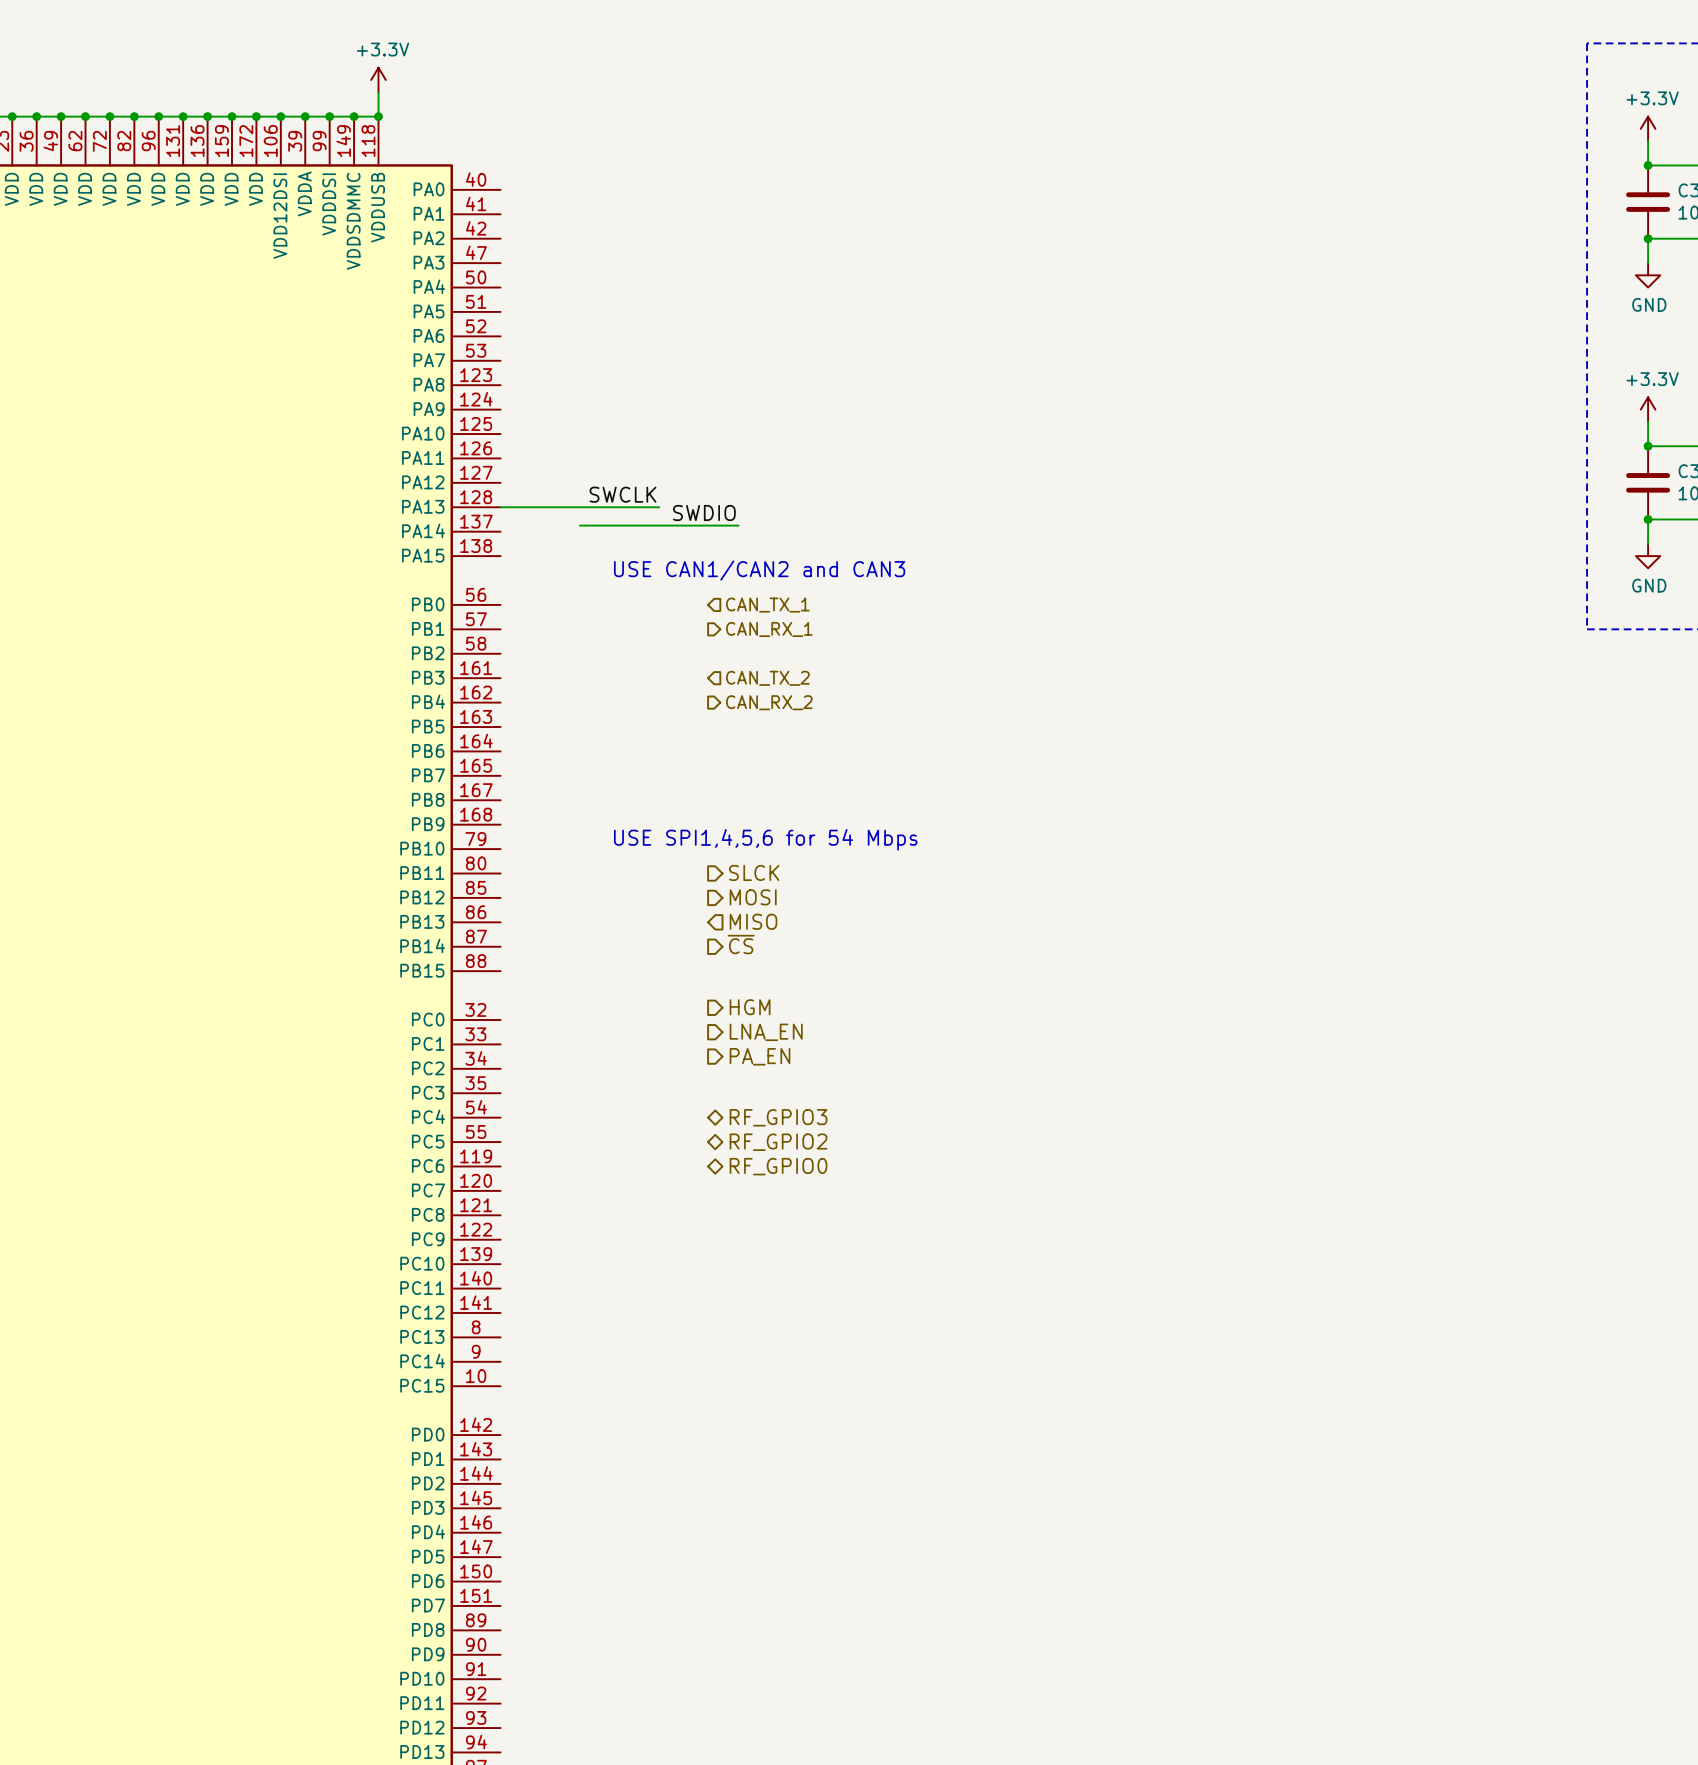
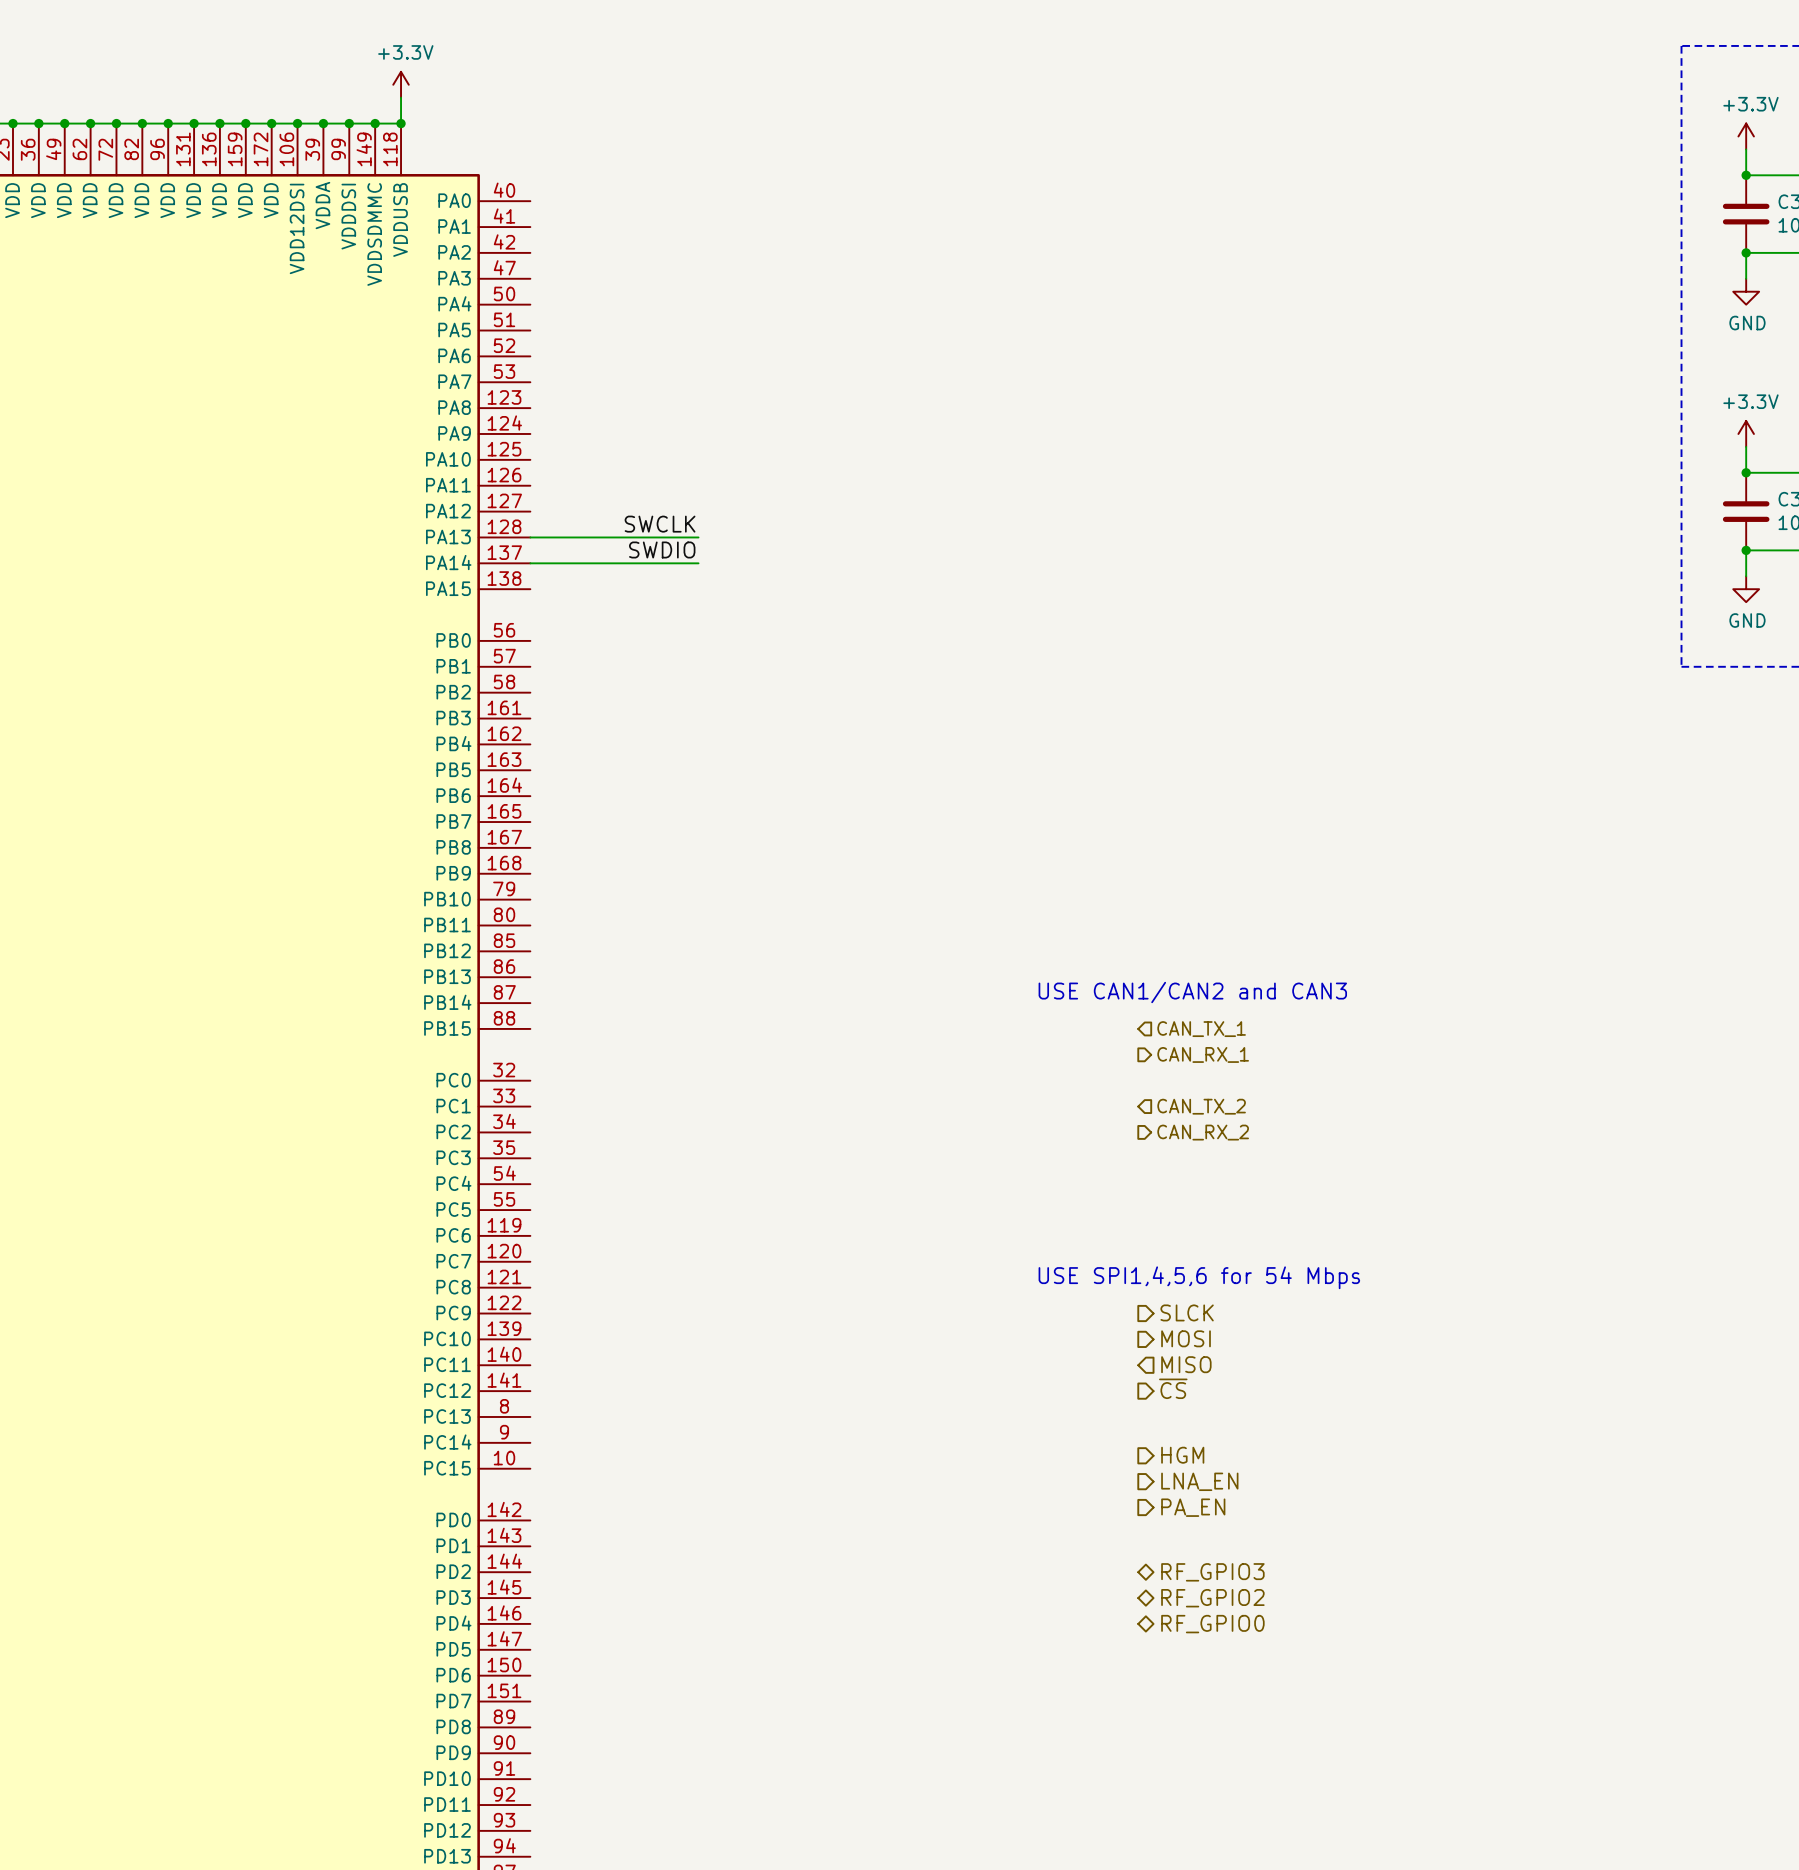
label position: SWDIO (704, 512) -> SWDIO (662, 549)
wire: (579, 525) (738, 525) -> (530, 563) (698, 563)
text: USE CAN1/CAN2 and CAN3 (759, 570) -> none
hierarchical label: CAN_TX_1 (767, 605) -> none
hierarchical label: CAN_RX_1 (769, 629) -> none
hierarchical label: CAN_TX_2 (767, 678) -> none
hierarchical label: CAN_RX_2 (769, 702) -> none
text: USE SPI1,4,5,6 for 54 Mbps (765, 839) -> none
hierarchical label: SLCK (754, 872) -> none
hierarchical label: MOSI (753, 897) -> none
hierarchical label: MISO (753, 921) -> none
text: none -> USE CAN1/CAN2 and CAN3 (1192, 992)
hierarchical label: ~{CS} (741, 944) -> none
hierarchical label: none -> CAN_TX_1 (1201, 1029)
hierarchical label: none -> CAN_RX_1 (1203, 1054)
hierarchical label: HGM (750, 1007) -> none
hierarchical label: LNA_EN (766, 1032) -> none
hierarchical label: none -> CAN_TX_2 (1201, 1106)
hierarchical label: PA_EN (760, 1056) -> none
hierarchical label: none -> CAN_RX_2 (1203, 1132)
hierarchical label: RF_GPIO3 (778, 1117) -> none
hierarchical label: RF_GPIO2 (778, 1142) -> none
hierarchical label: RF_GPIO0 (778, 1166) -> none
text: none -> USE SPI1,4,5,6 for 54 Mbps (1199, 1277)
hierarchical label: none -> SLCK (1187, 1312)
hierarchical label: none -> MOSI (1186, 1338)
hierarchical label: none -> MISO (1186, 1364)
hierarchical label: none -> ~{CS} (1173, 1388)
hierarchical label: none -> HGM (1182, 1455)
hierarchical label: none -> LNA_EN (1199, 1481)
hierarchical label: none -> PA_EN (1193, 1507)
hierarchical label: none -> RF_GPIO3 (1212, 1572)
hierarchical label: none -> RF_GPIO2 (1212, 1598)
hierarchical label: none -> RF_GPIO0 (1212, 1624)

